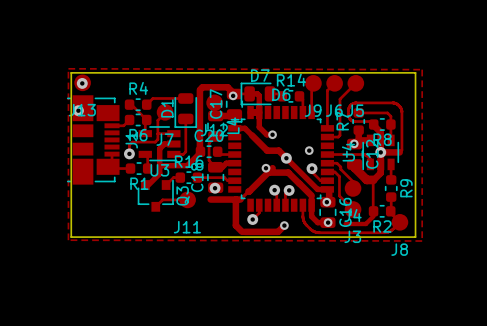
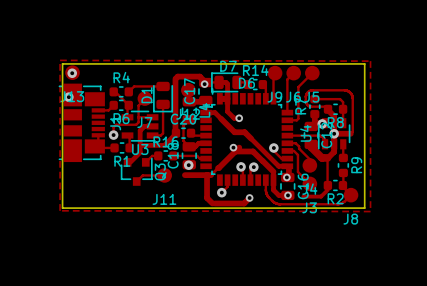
via: none -> (322, 123)
via: (354, 143) -> none
via: (309, 150) -> none
via: (286, 158) -> none

